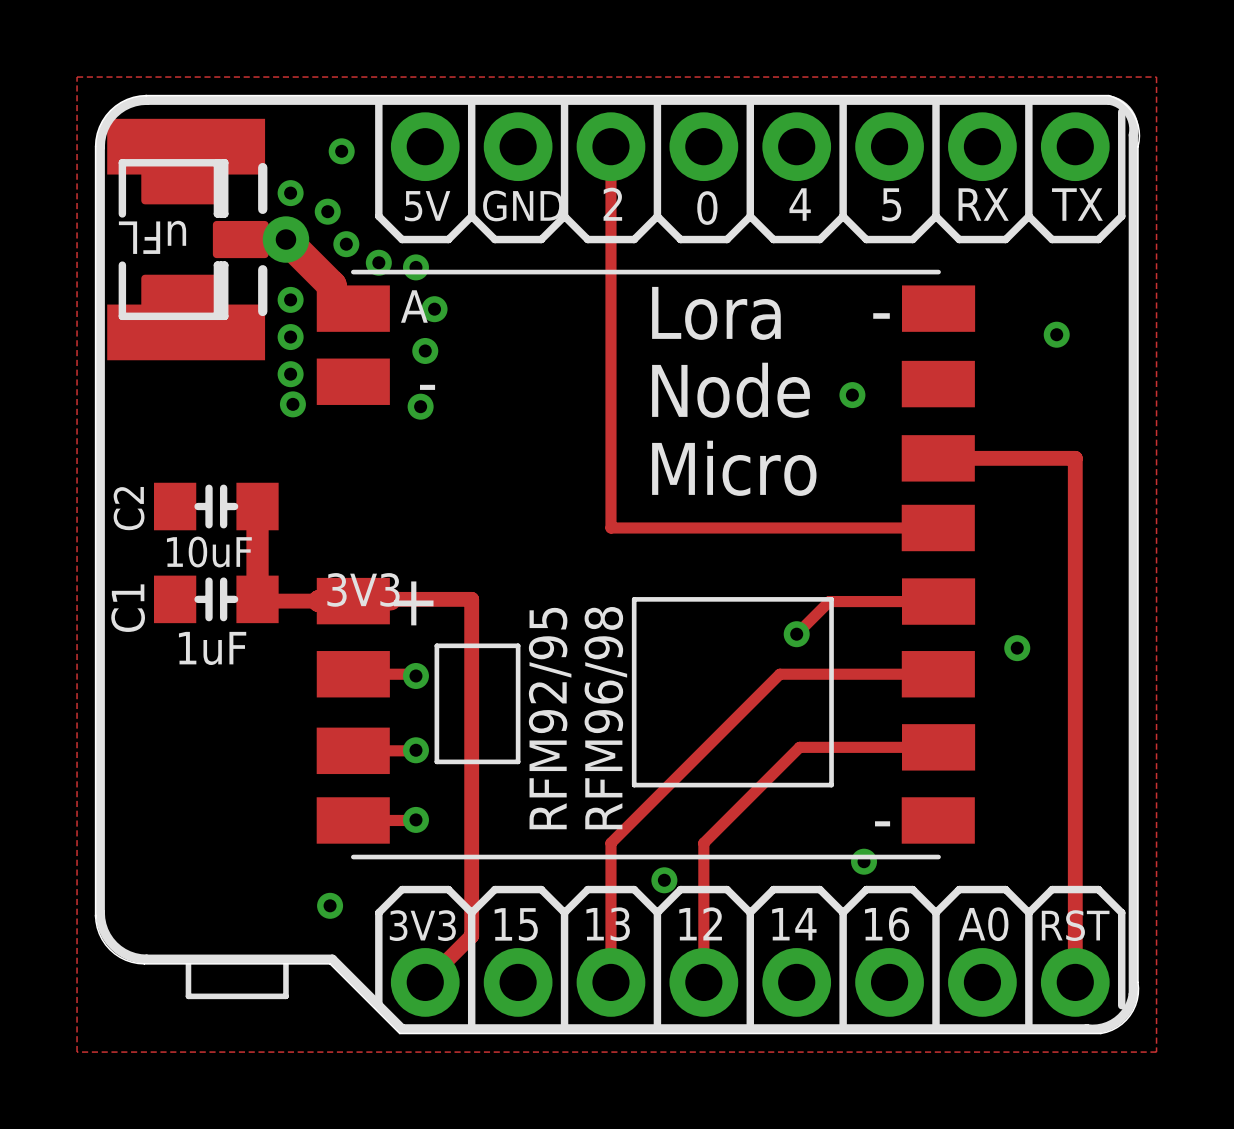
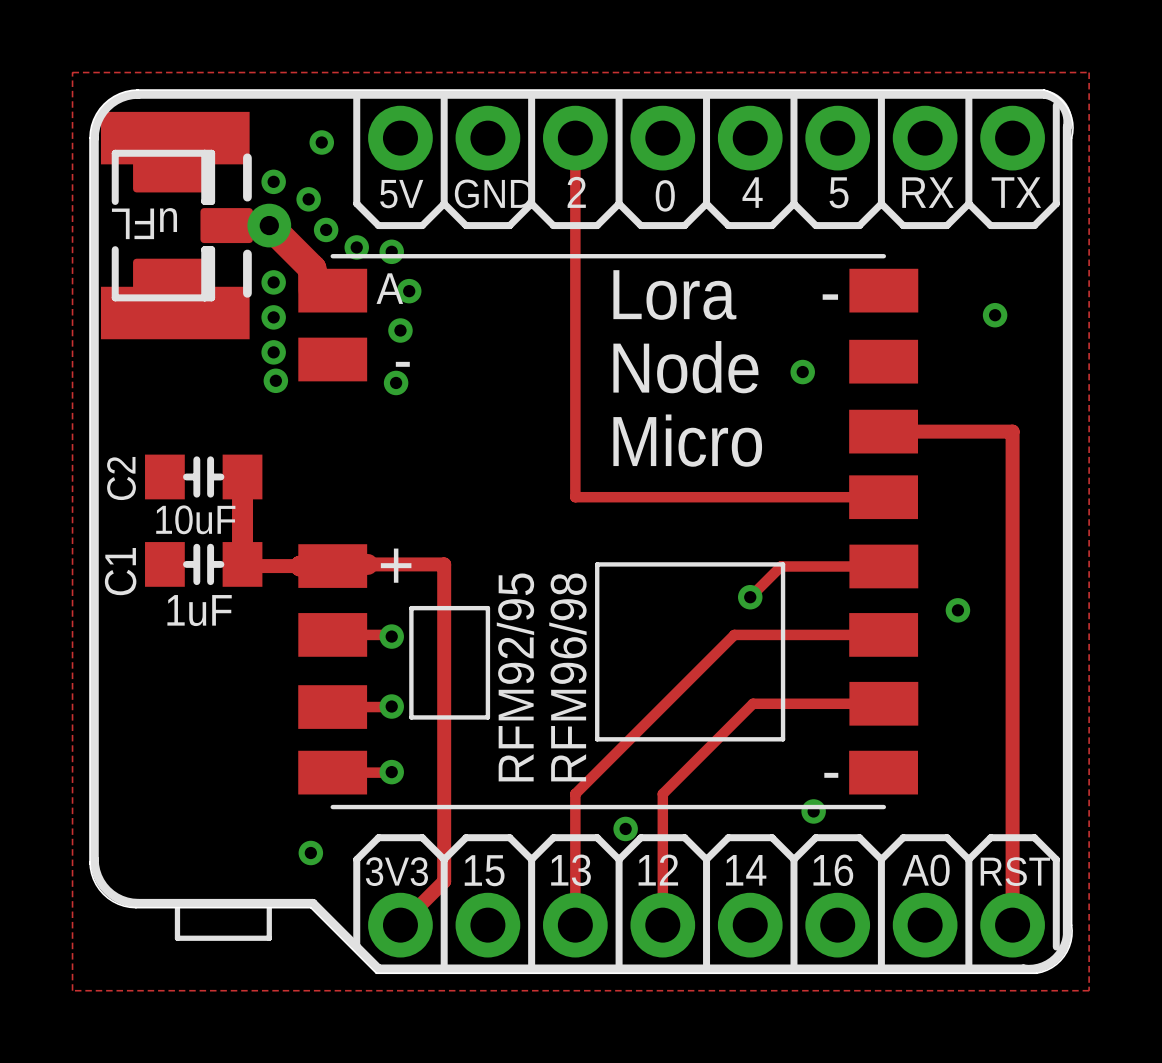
text: 3V3 (363, 589) -> none

